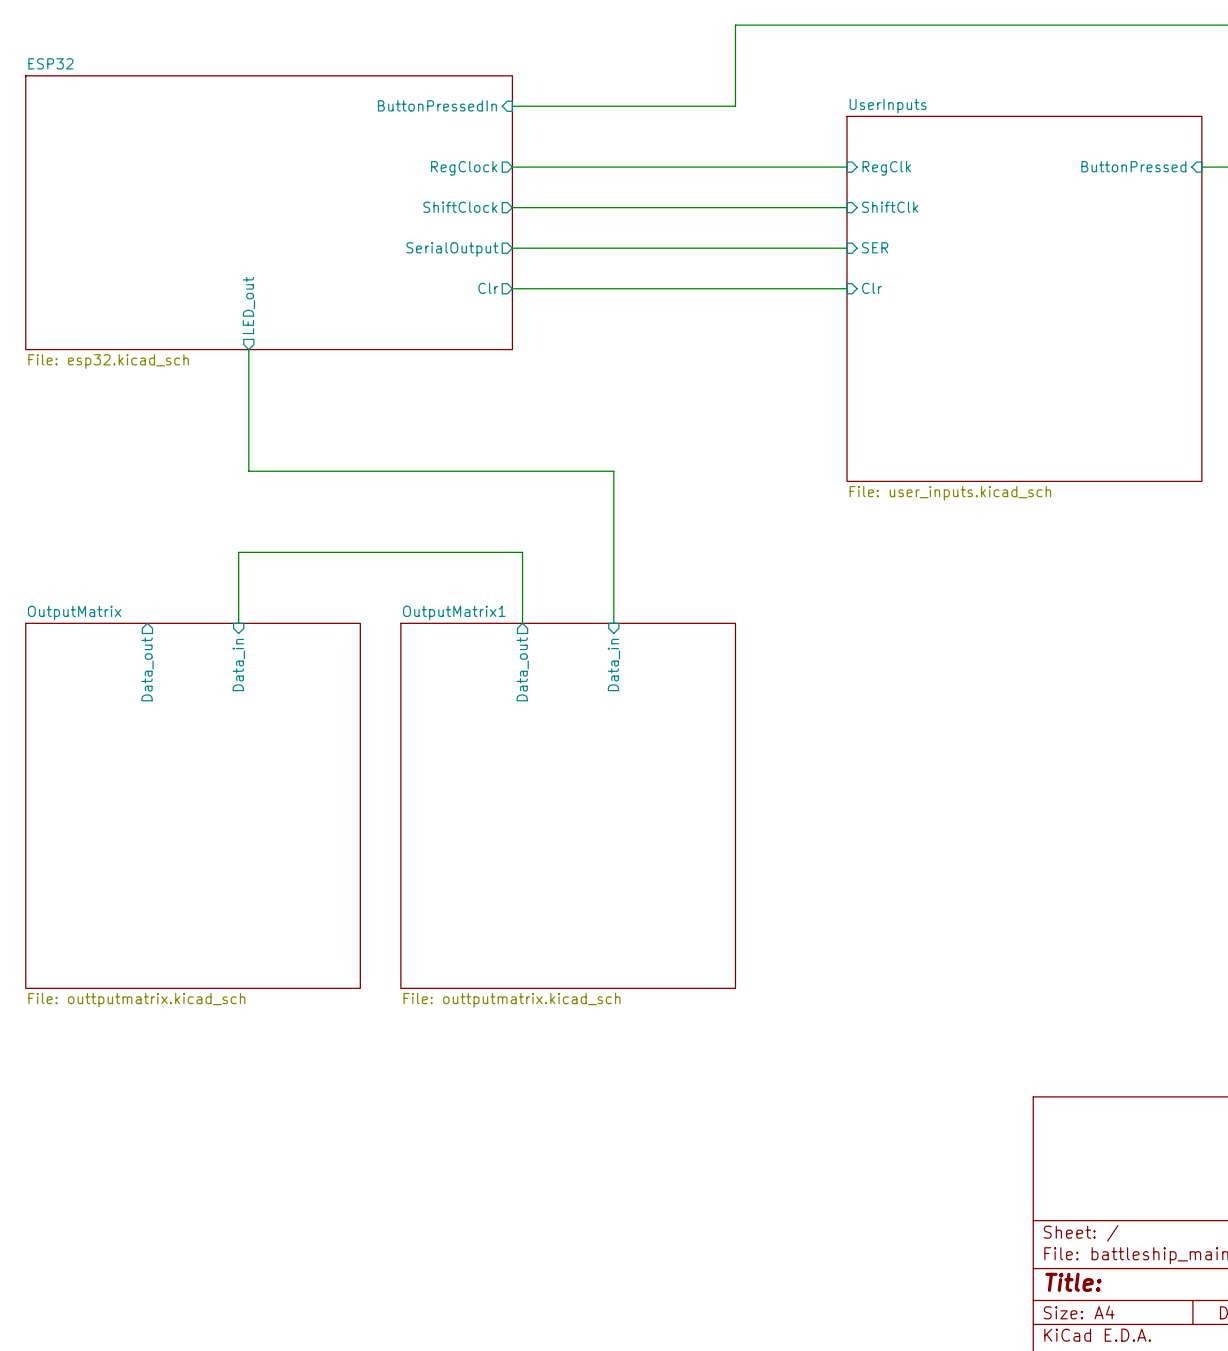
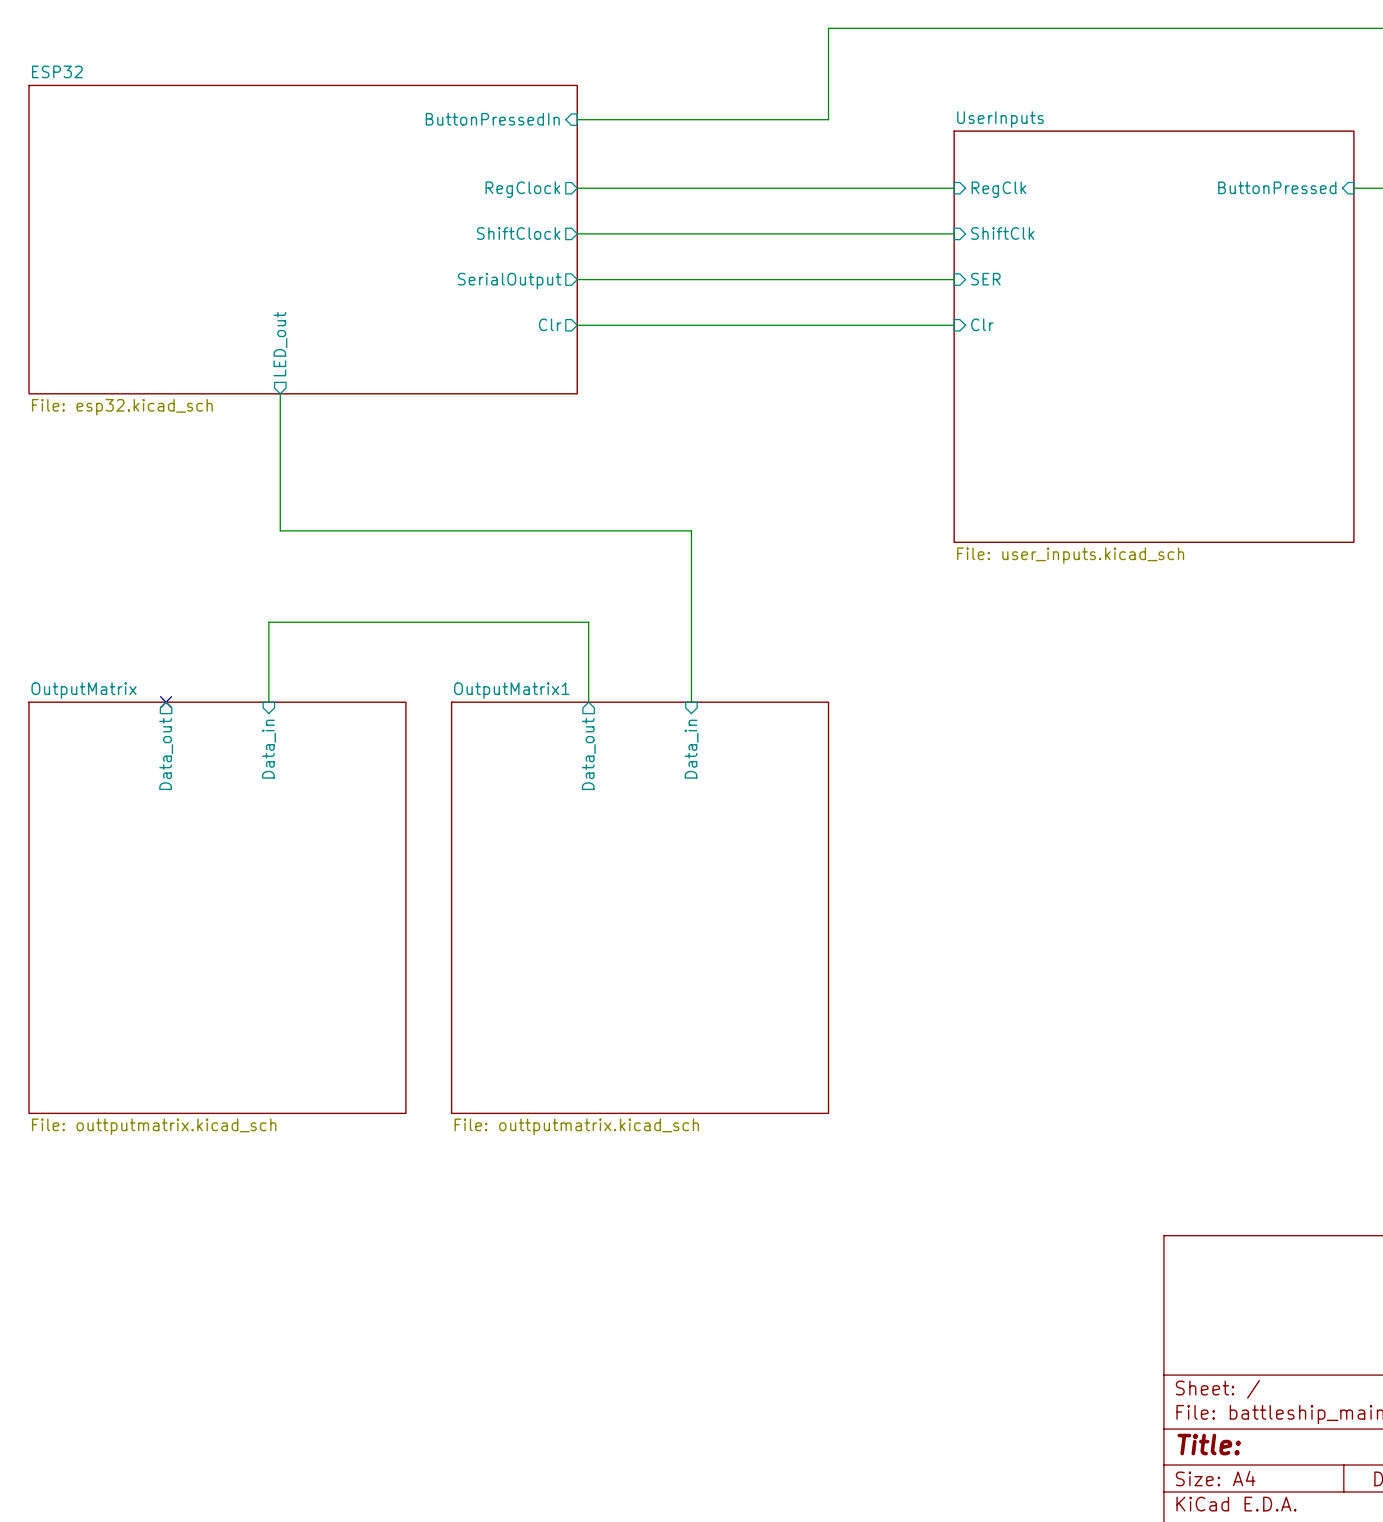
no-connect mark: none -> (166, 702)

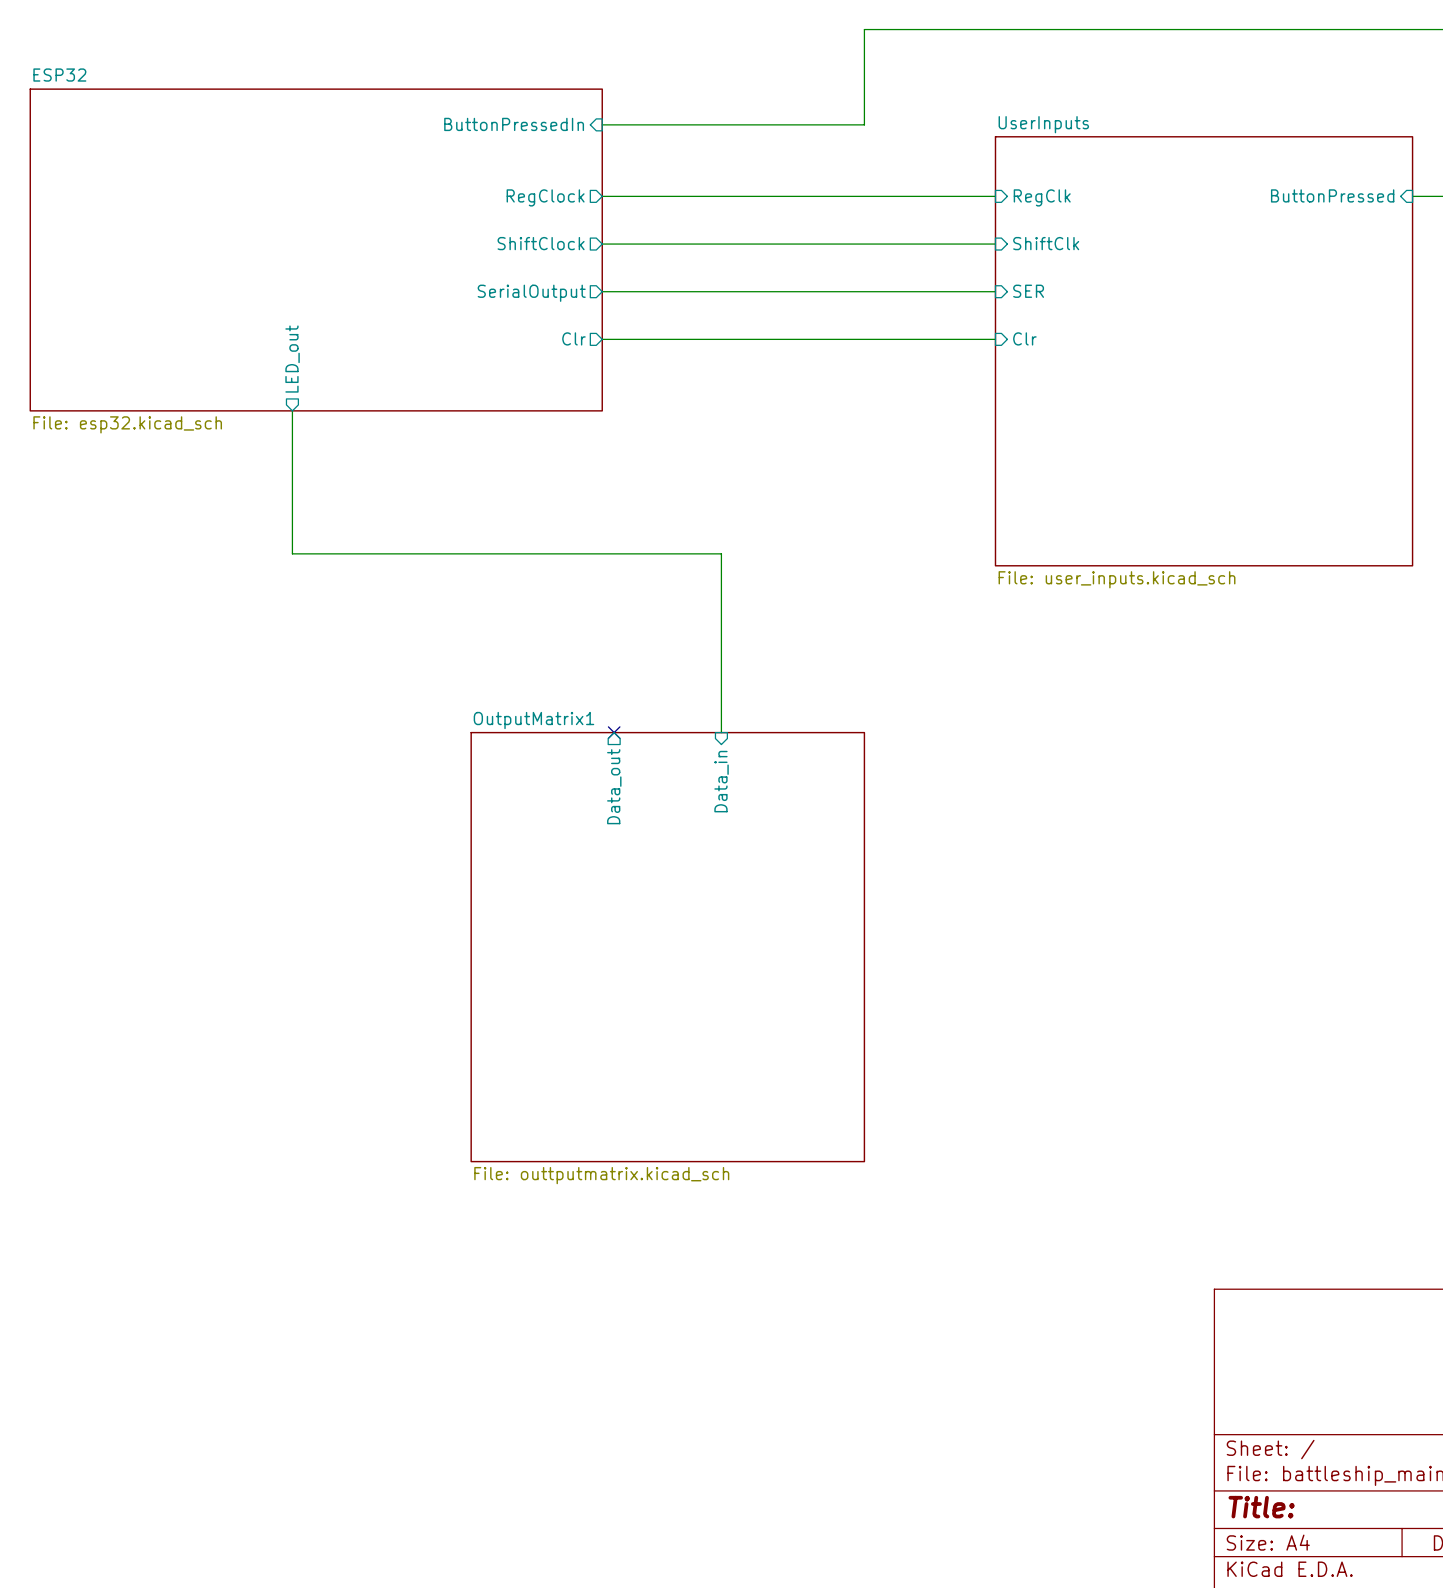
no-connect mark: (166, 702) -> none
wire: (268, 702) (268, 622) (588, 622) (588, 702) -> none
no-connect mark: none -> (614, 732)
sheet pin: Data_in (268, 749) -> none
sheet pin: Data_out (166, 754) -> none
sheet OutputMatrix: File: outtputmatrix.kicad_sch (217, 907) -> none

